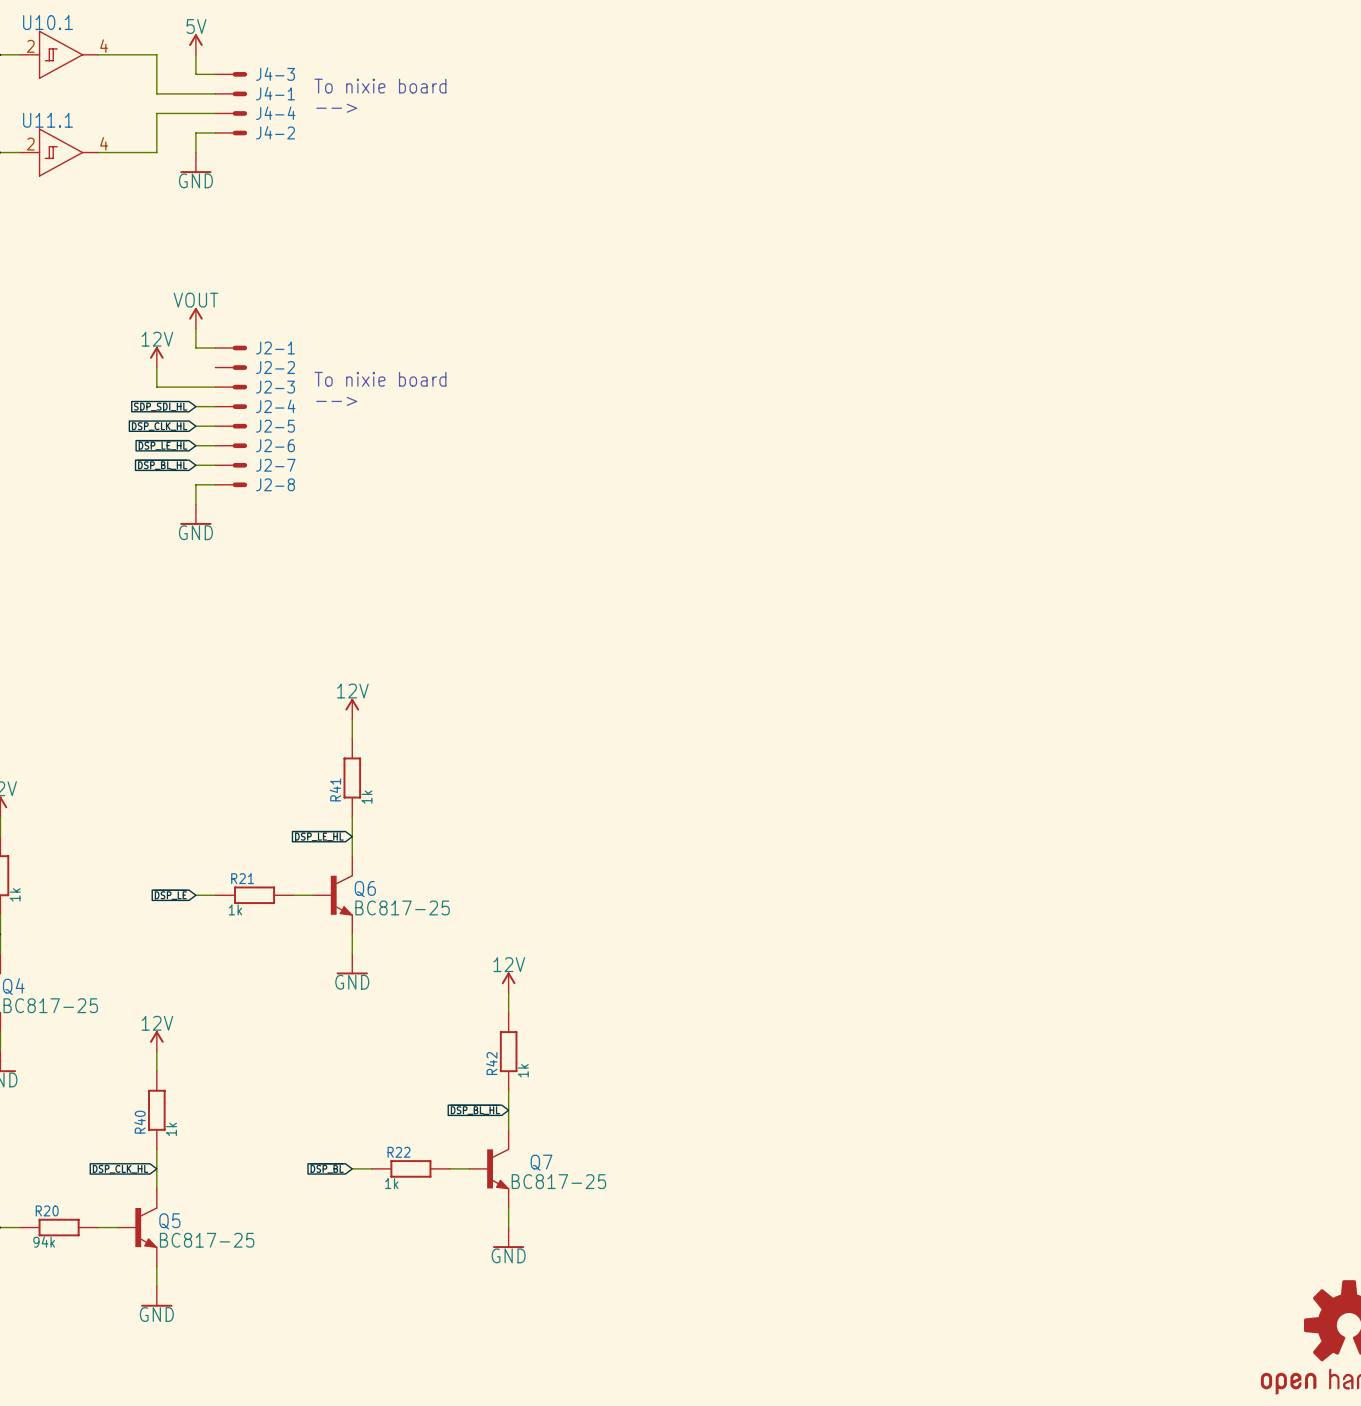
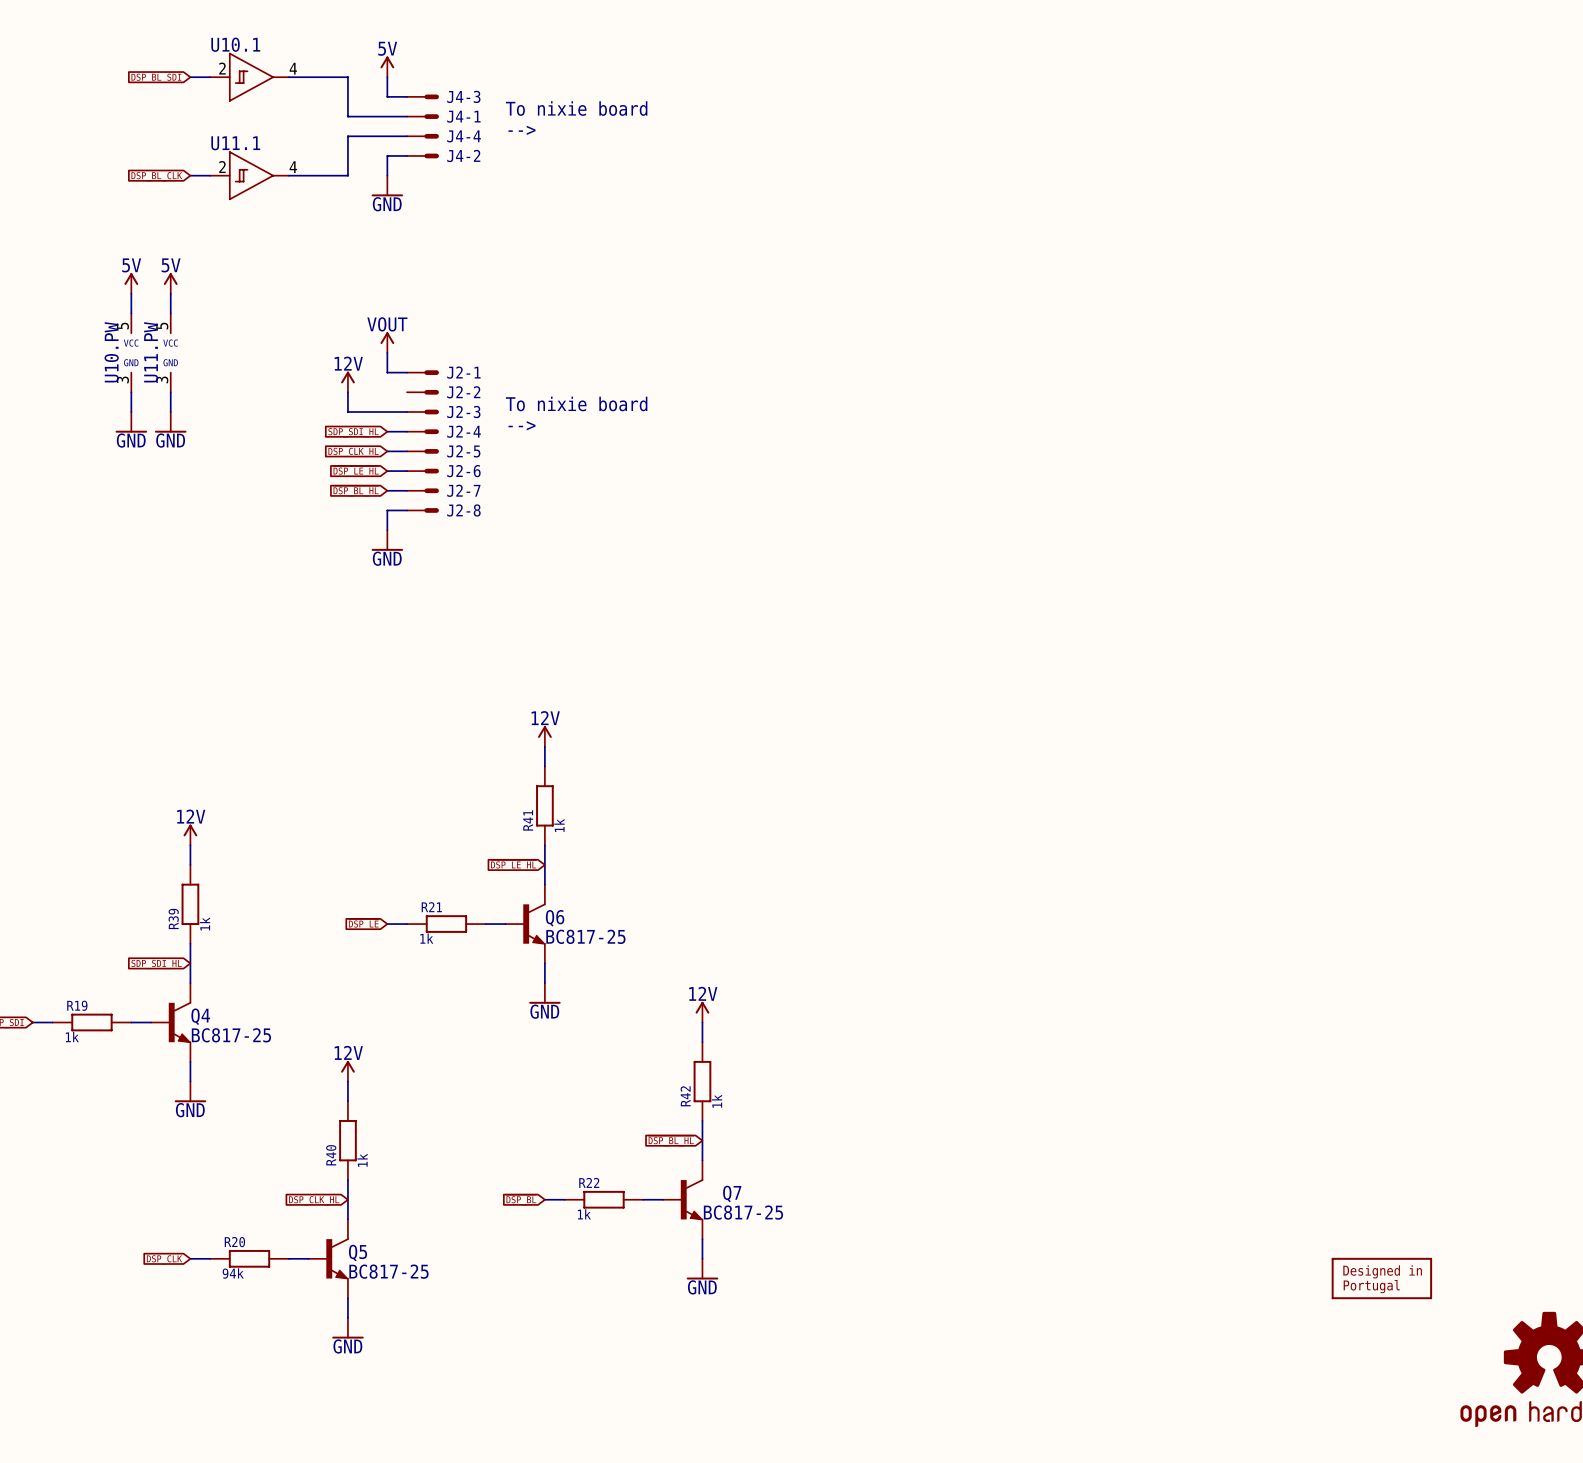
part: none -> (1381, 1278)

